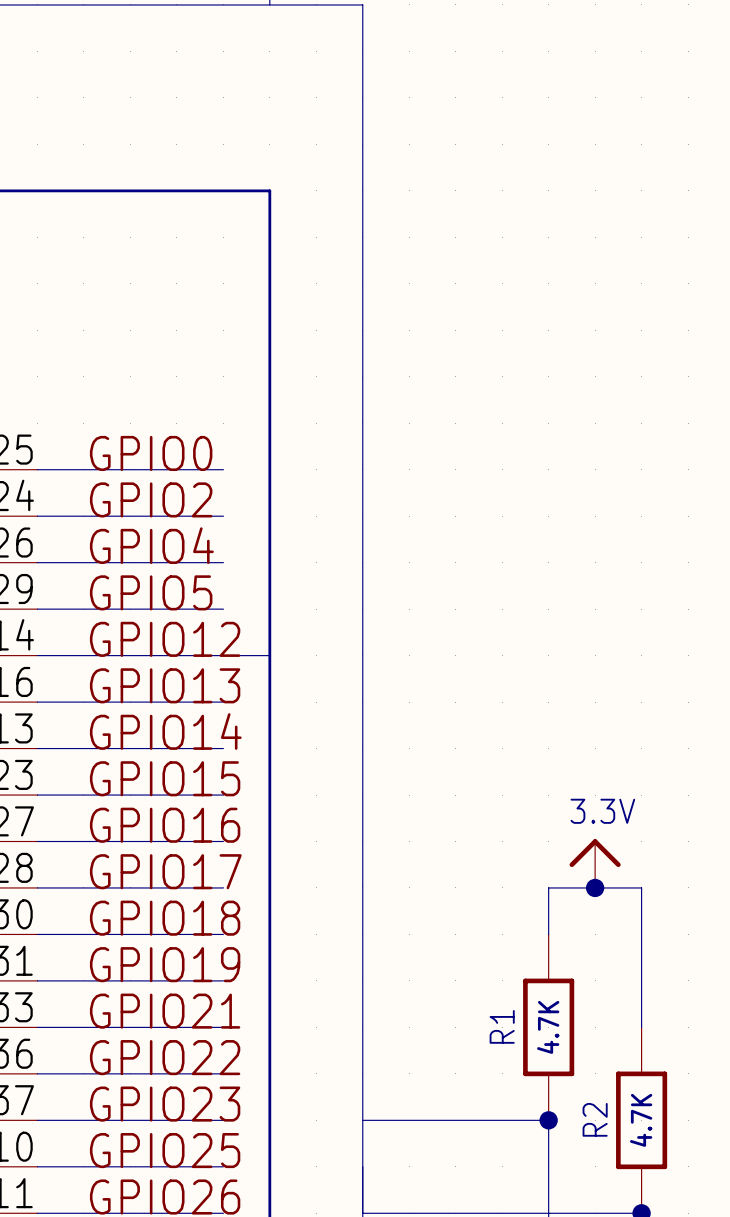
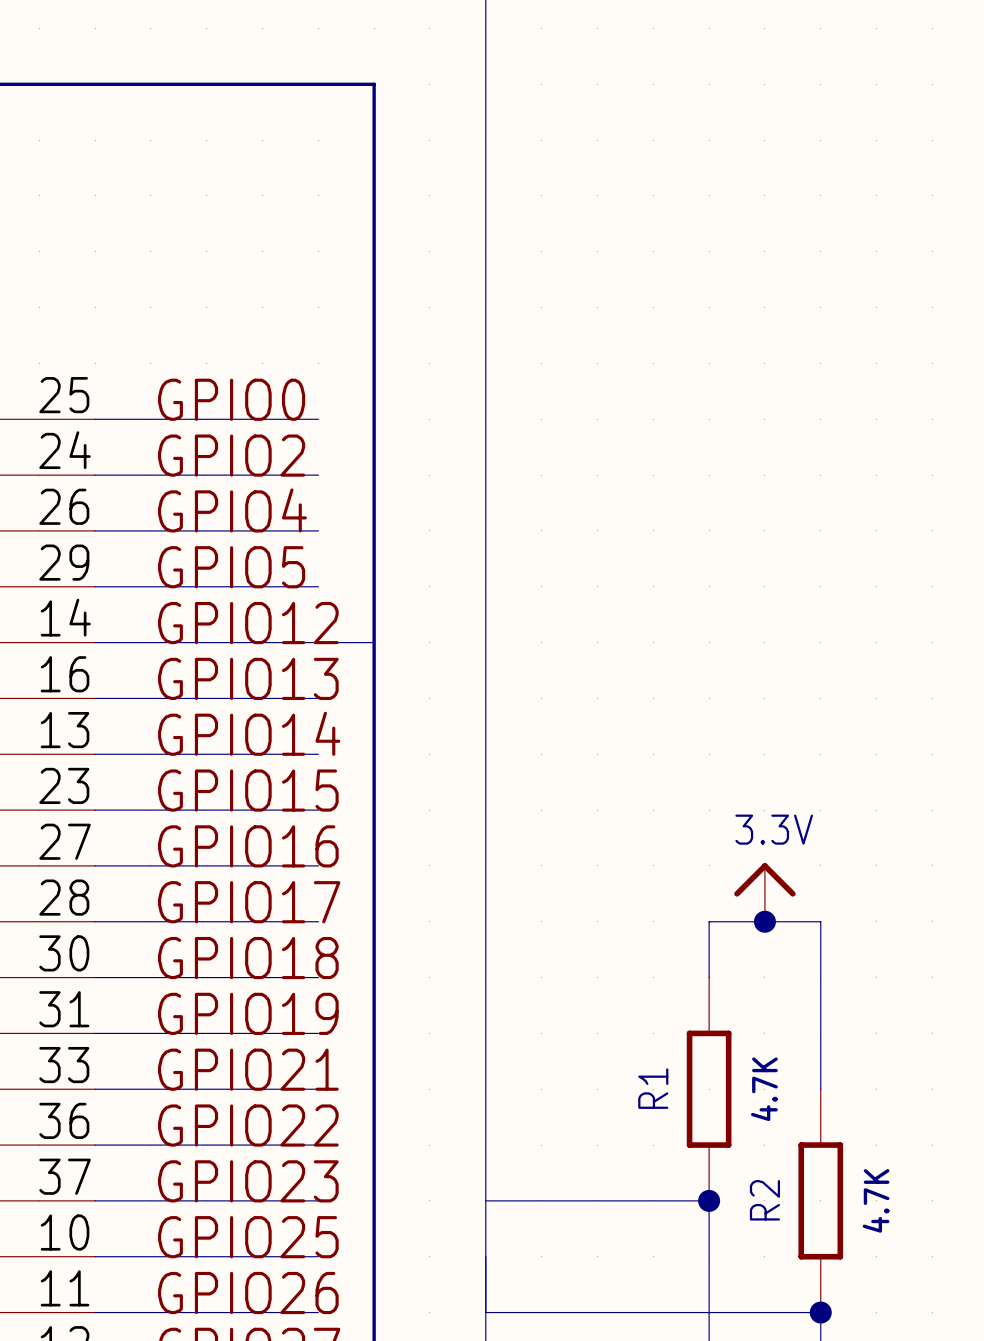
R1 symbol: [523, 934, 575, 1121] -> [686, 977, 732, 1201]
R1 value position: 4.7K (548, 1027) -> 4.7K (764, 1089)
R2 symbol: [616, 1027, 668, 1214] -> [798, 1089, 844, 1313]
R2 value position: 4.7K (641, 1120) -> 4.7K (876, 1200)

